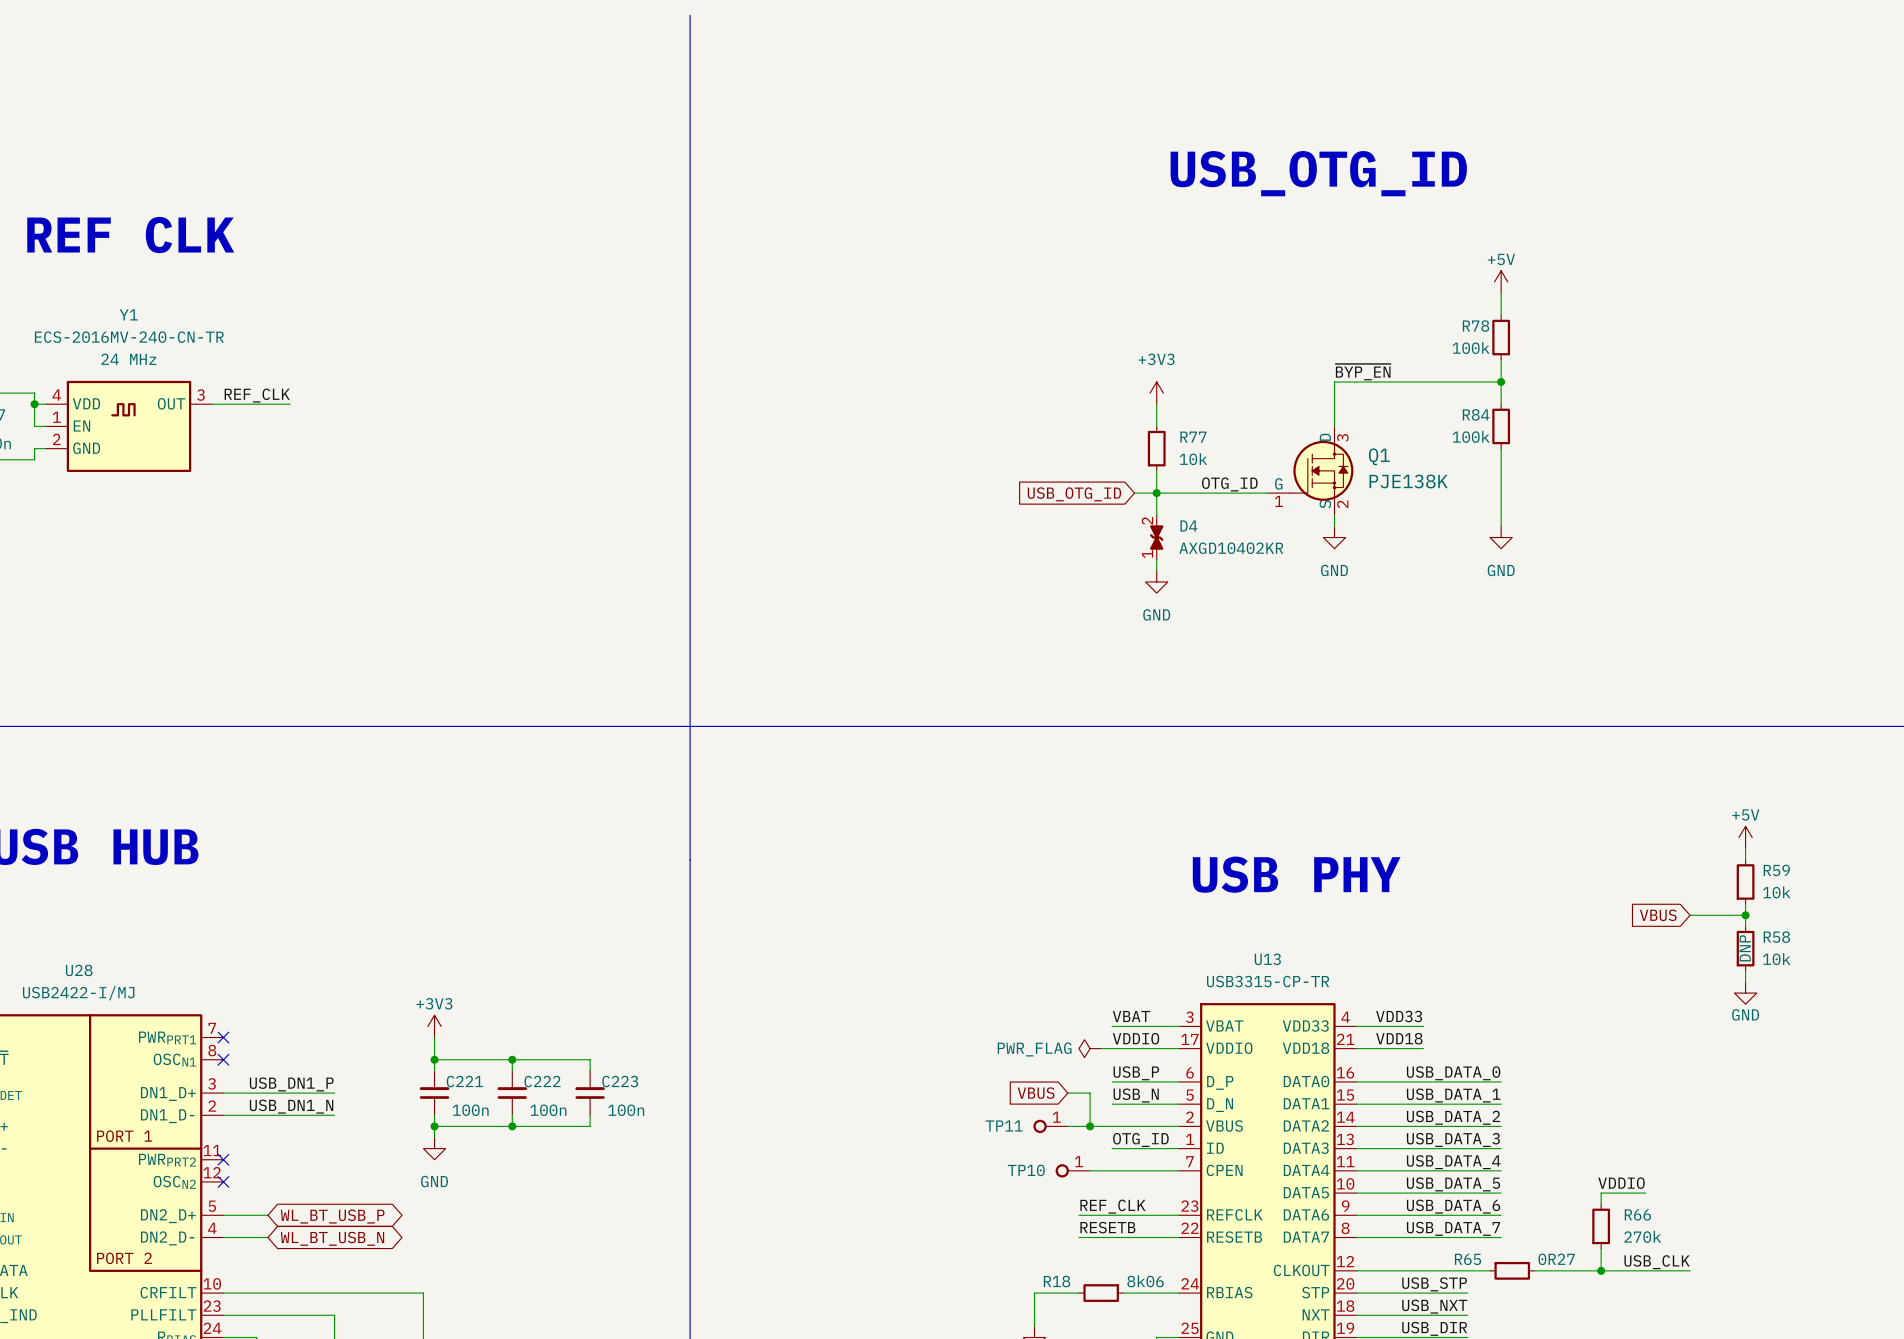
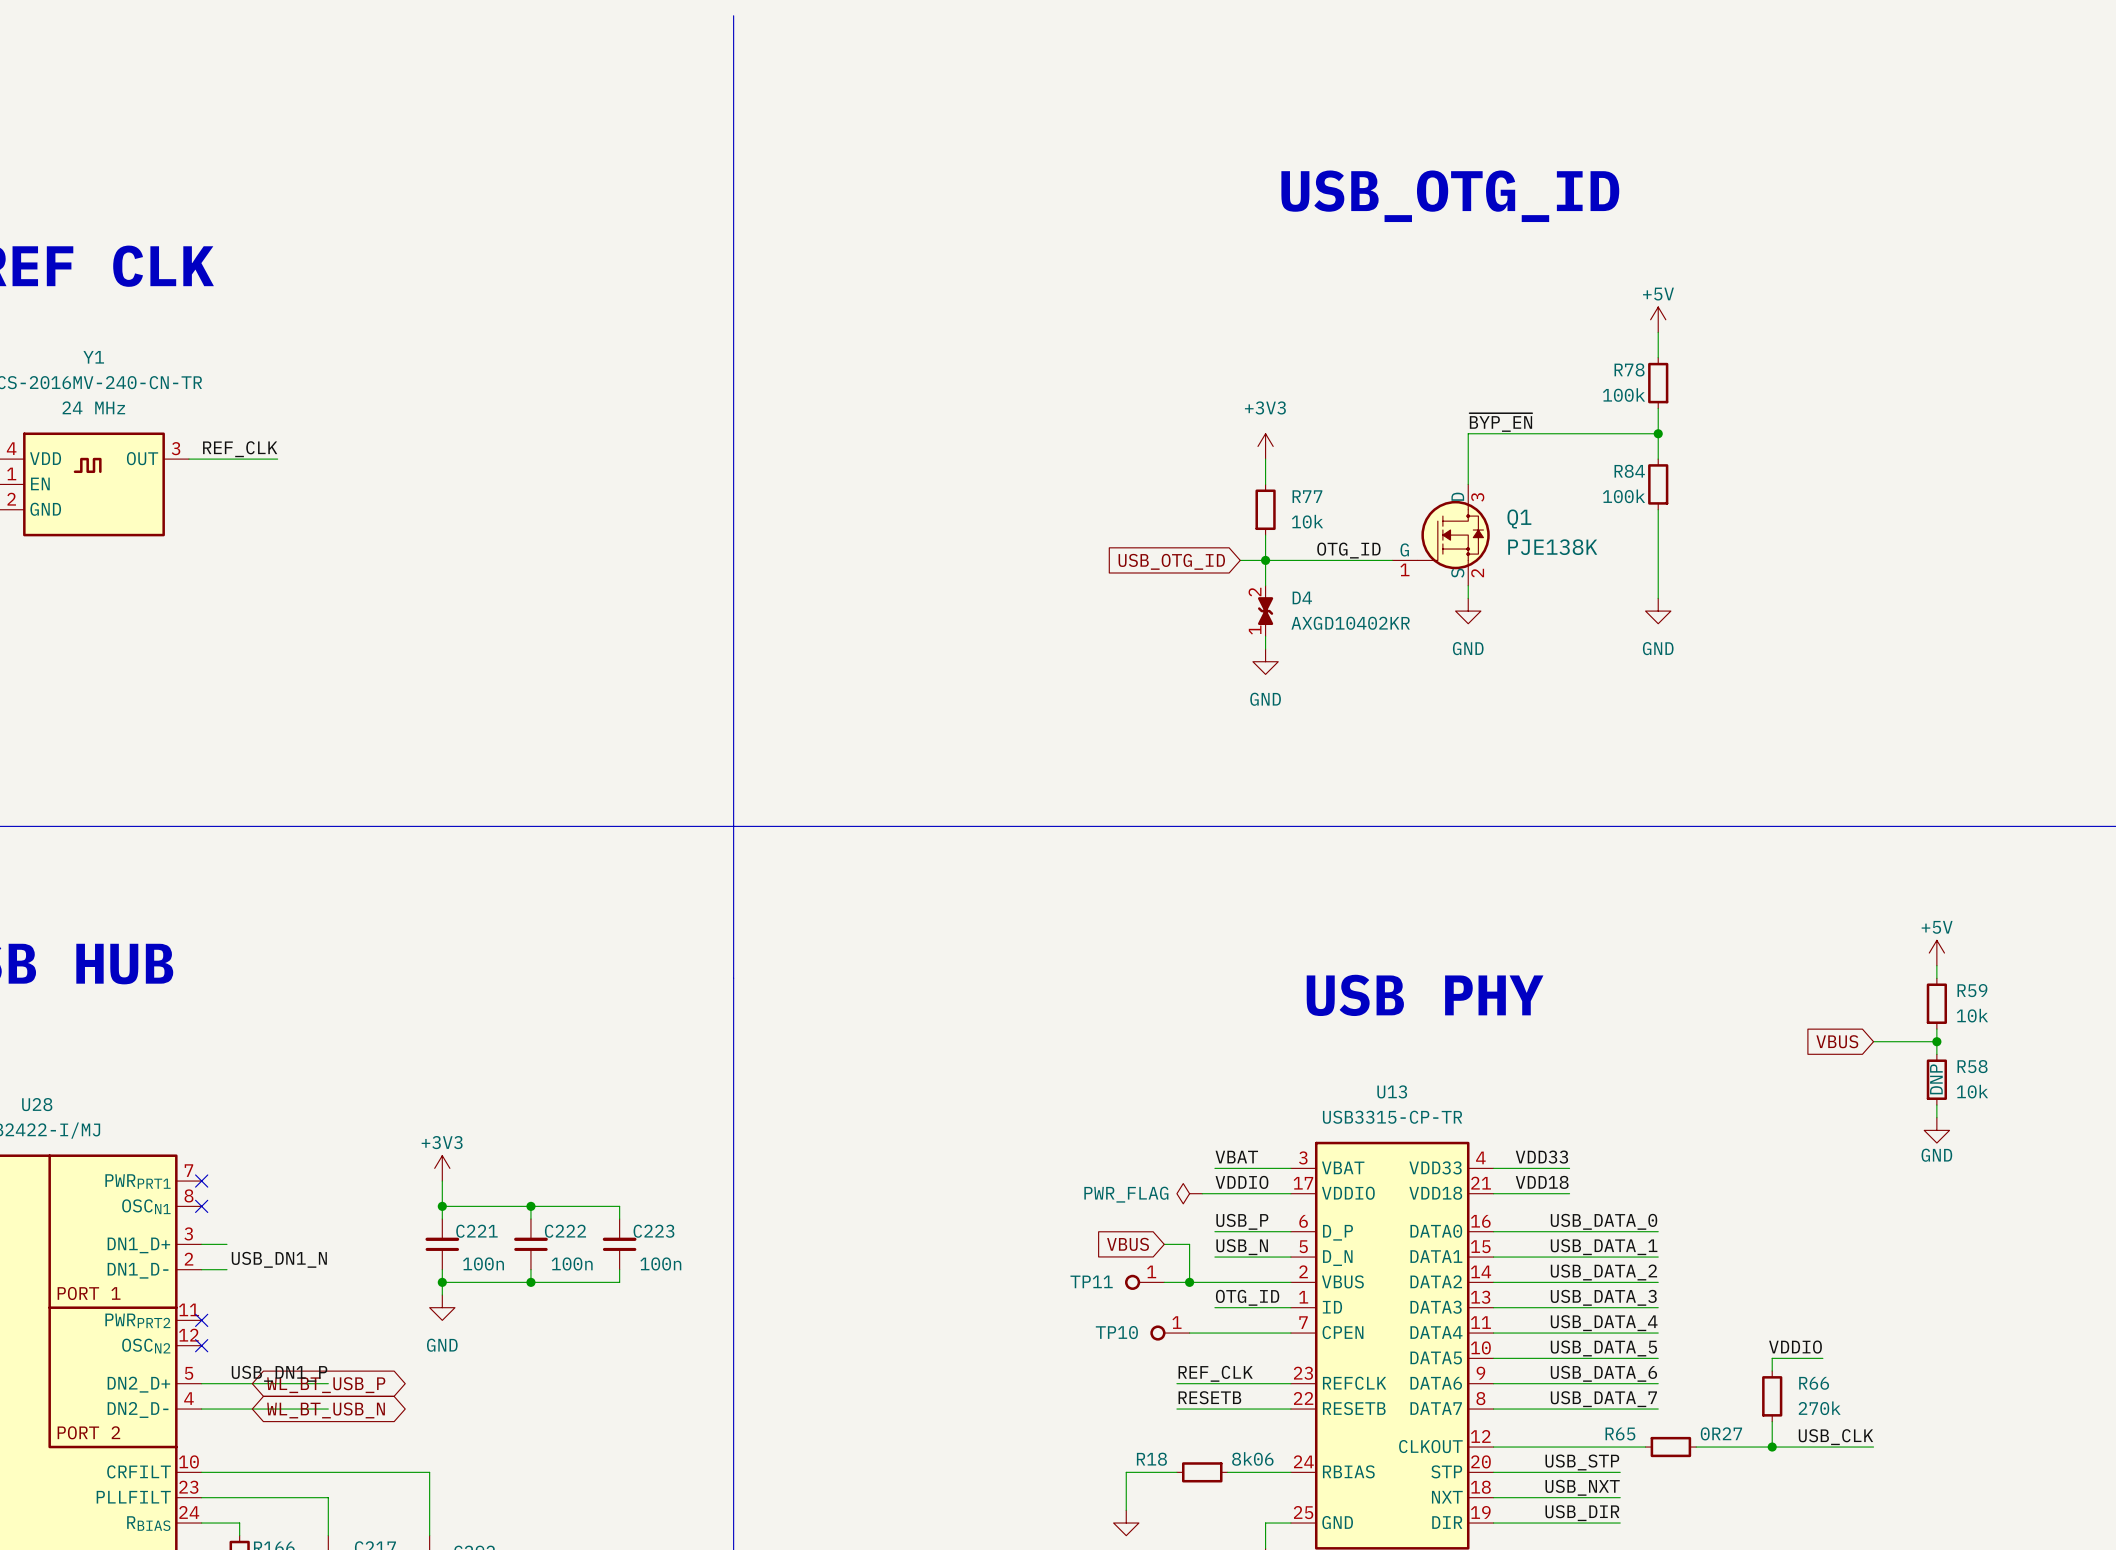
label position: USB_DN1_P (291, 1084) -> USB_DN1_P (279, 1373)
wire: (245, 1093) (334, 1093) -> none
wire: (245, 1115) (334, 1115) -> none
wire: none -> (252, 1383) (328, 1383)
wire: none -> (252, 1409) (328, 1409)

